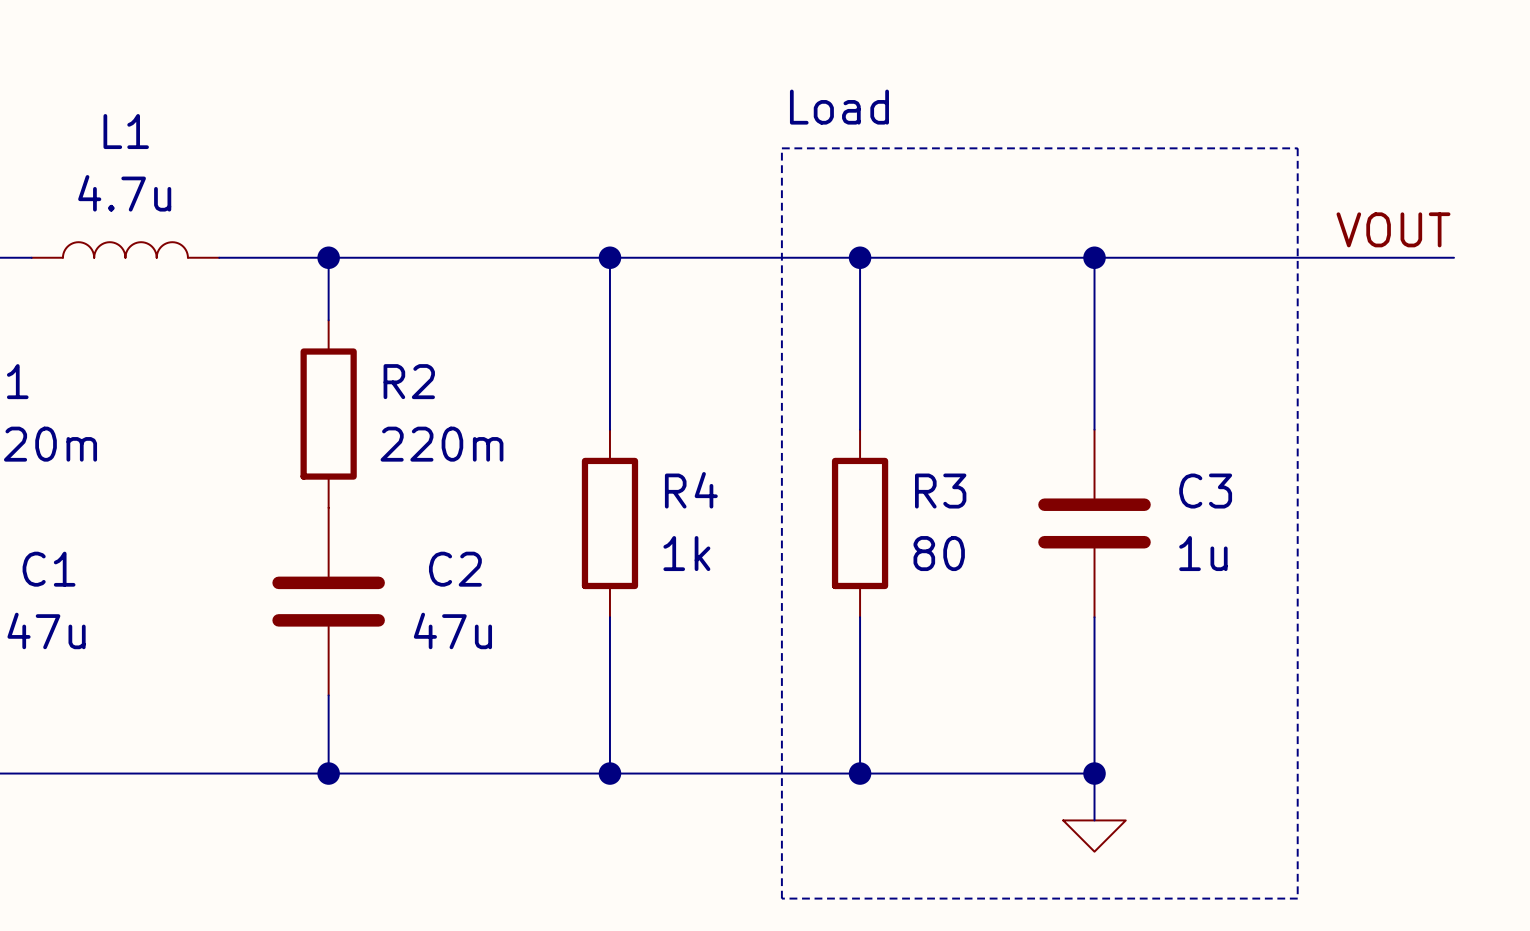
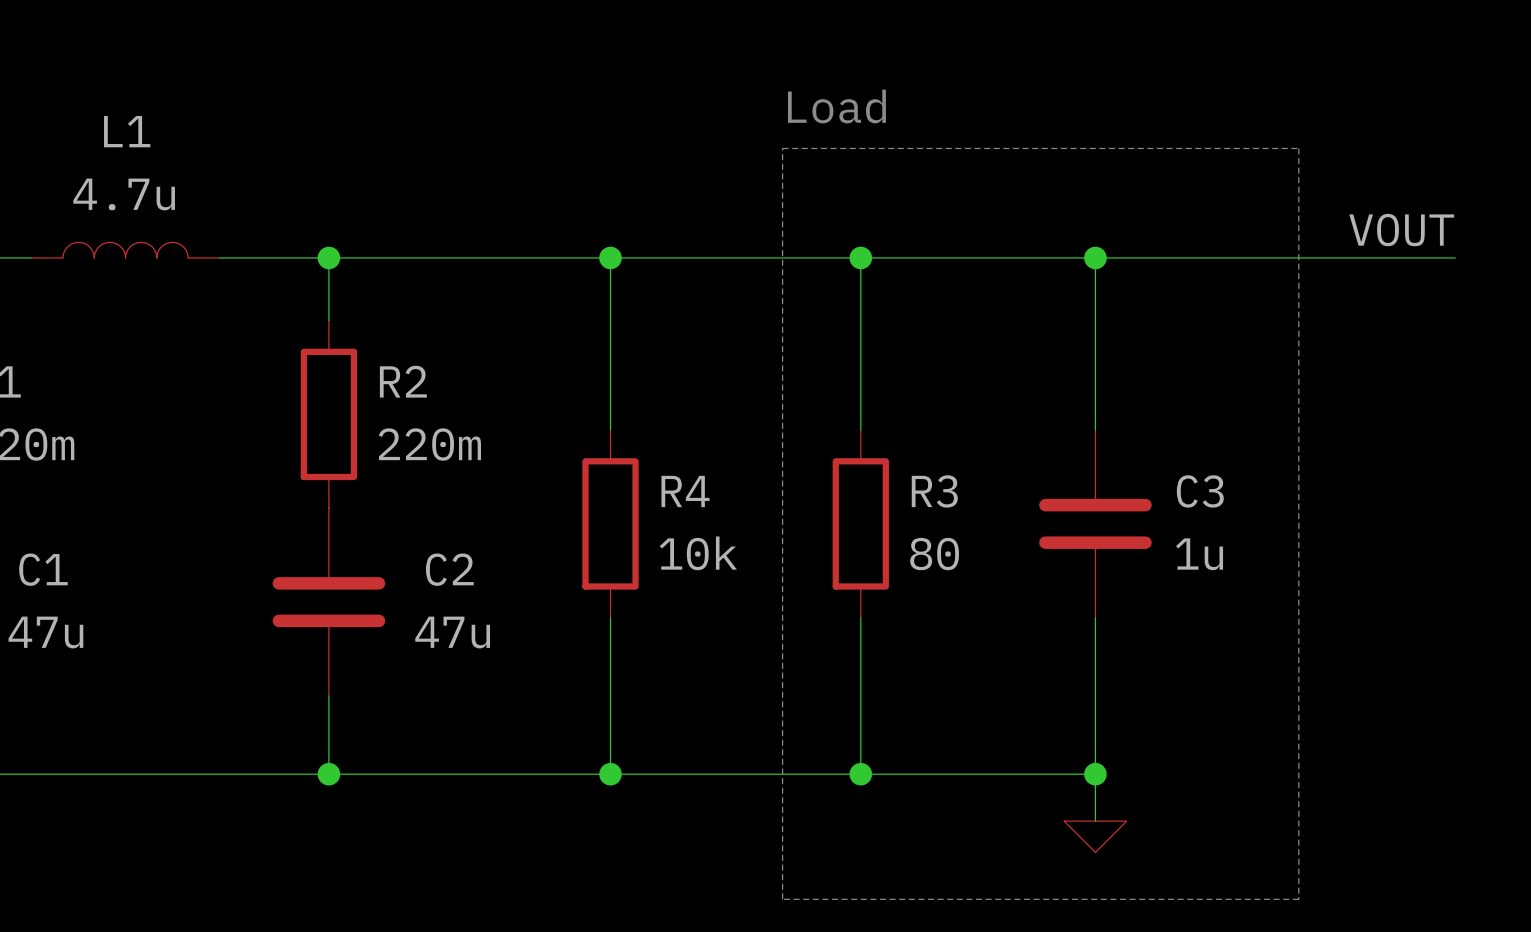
R4 value: 1k (686, 553) -> 10k (698, 553)

